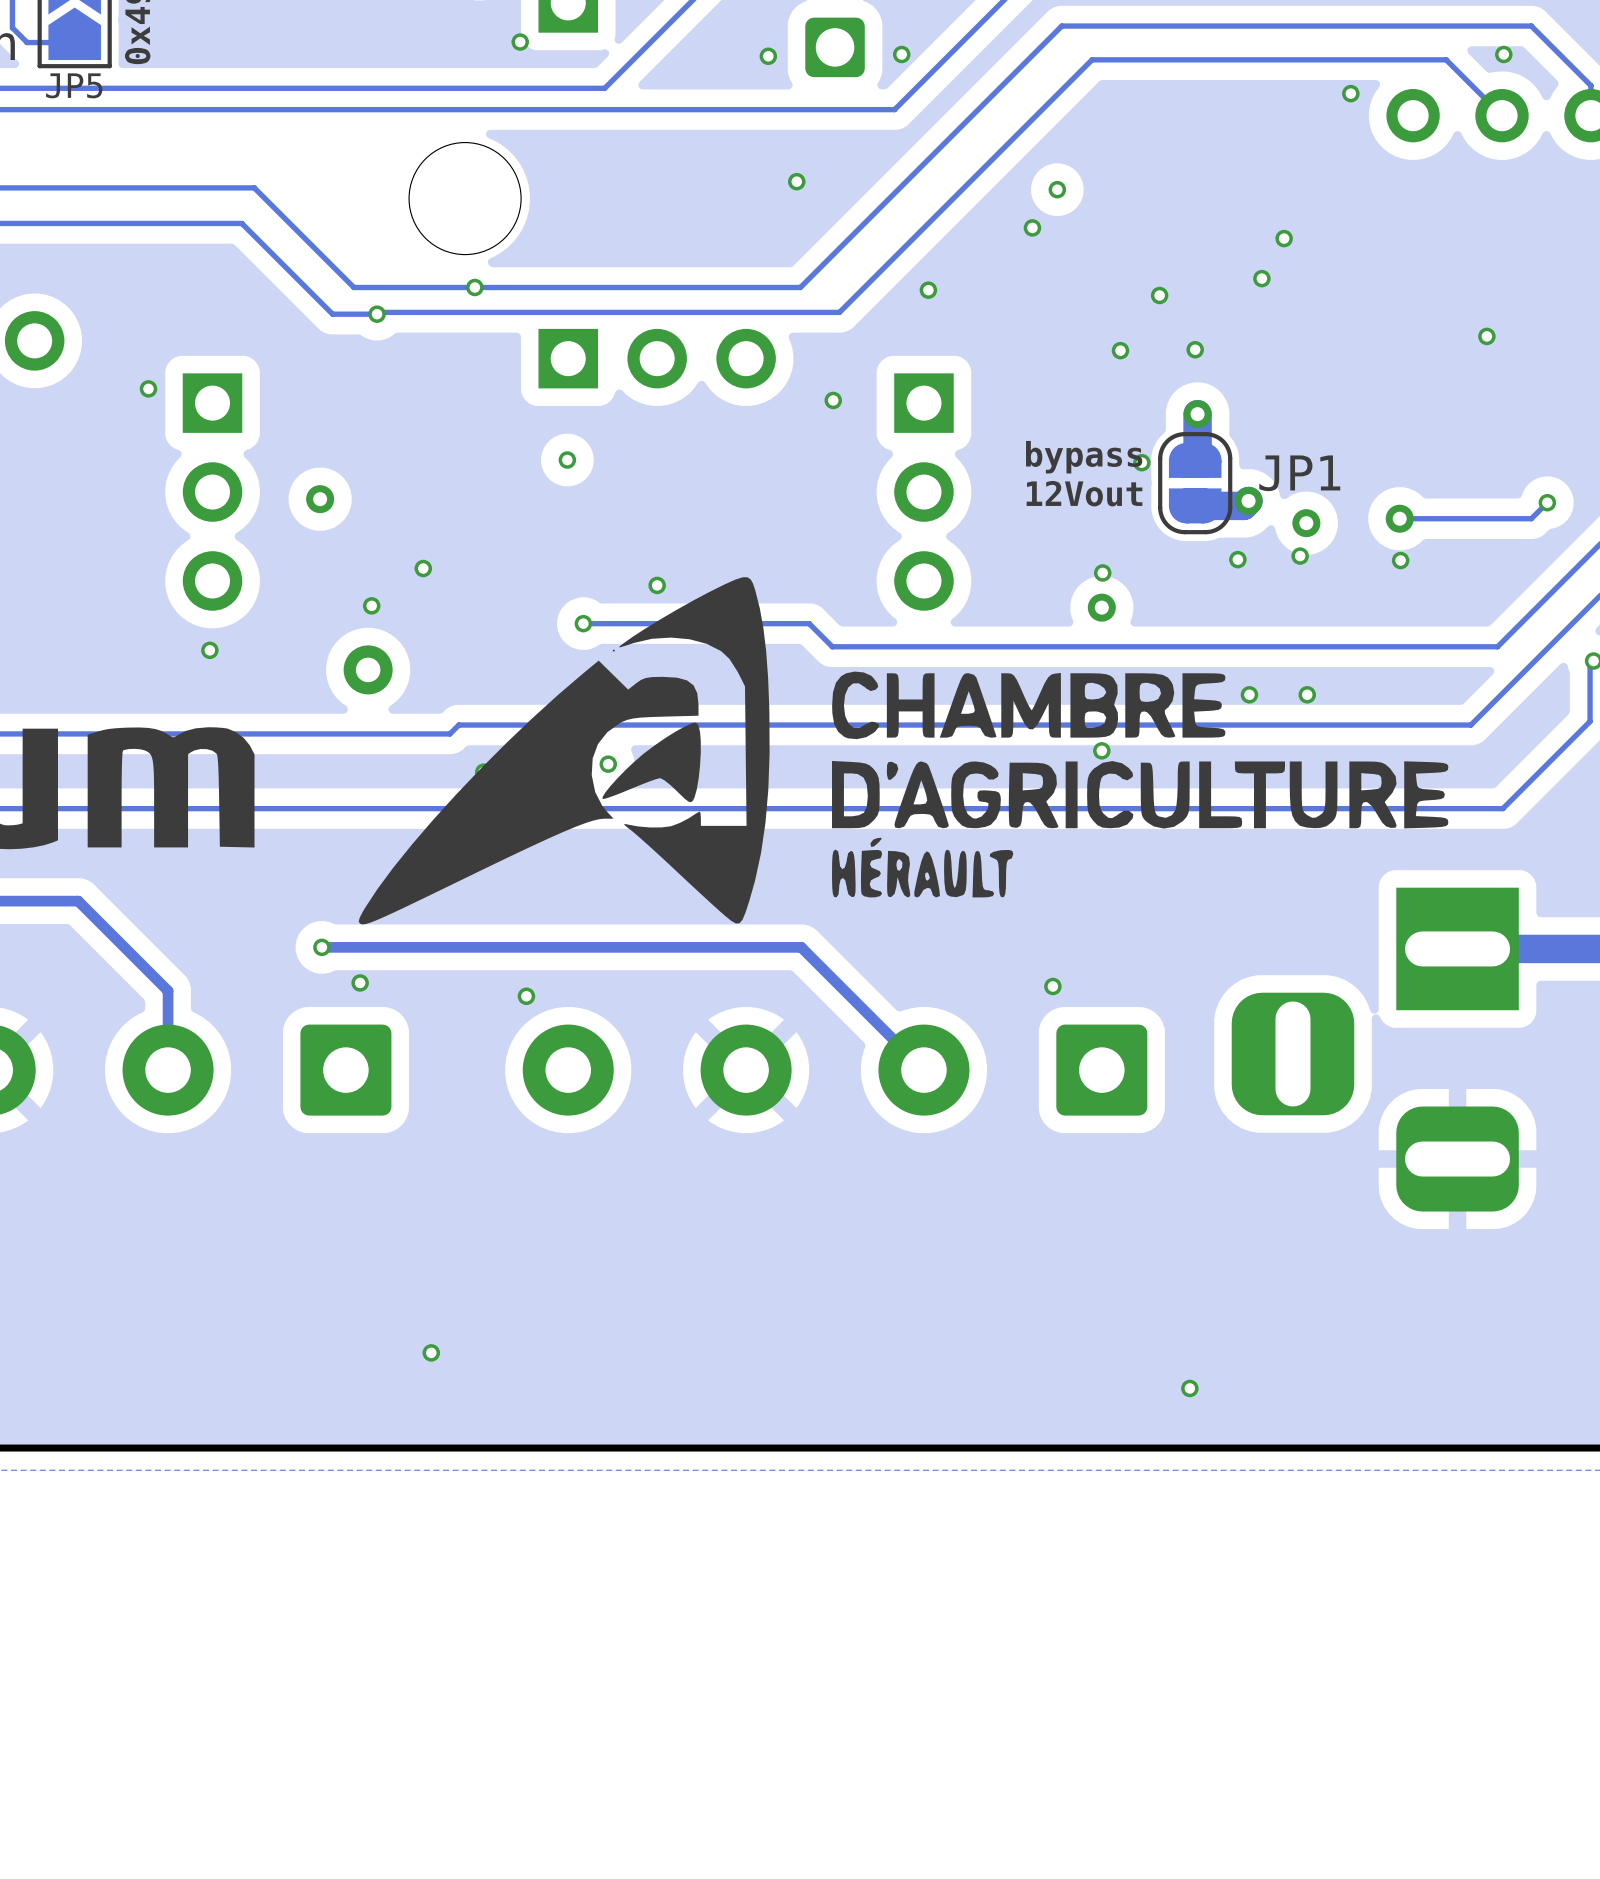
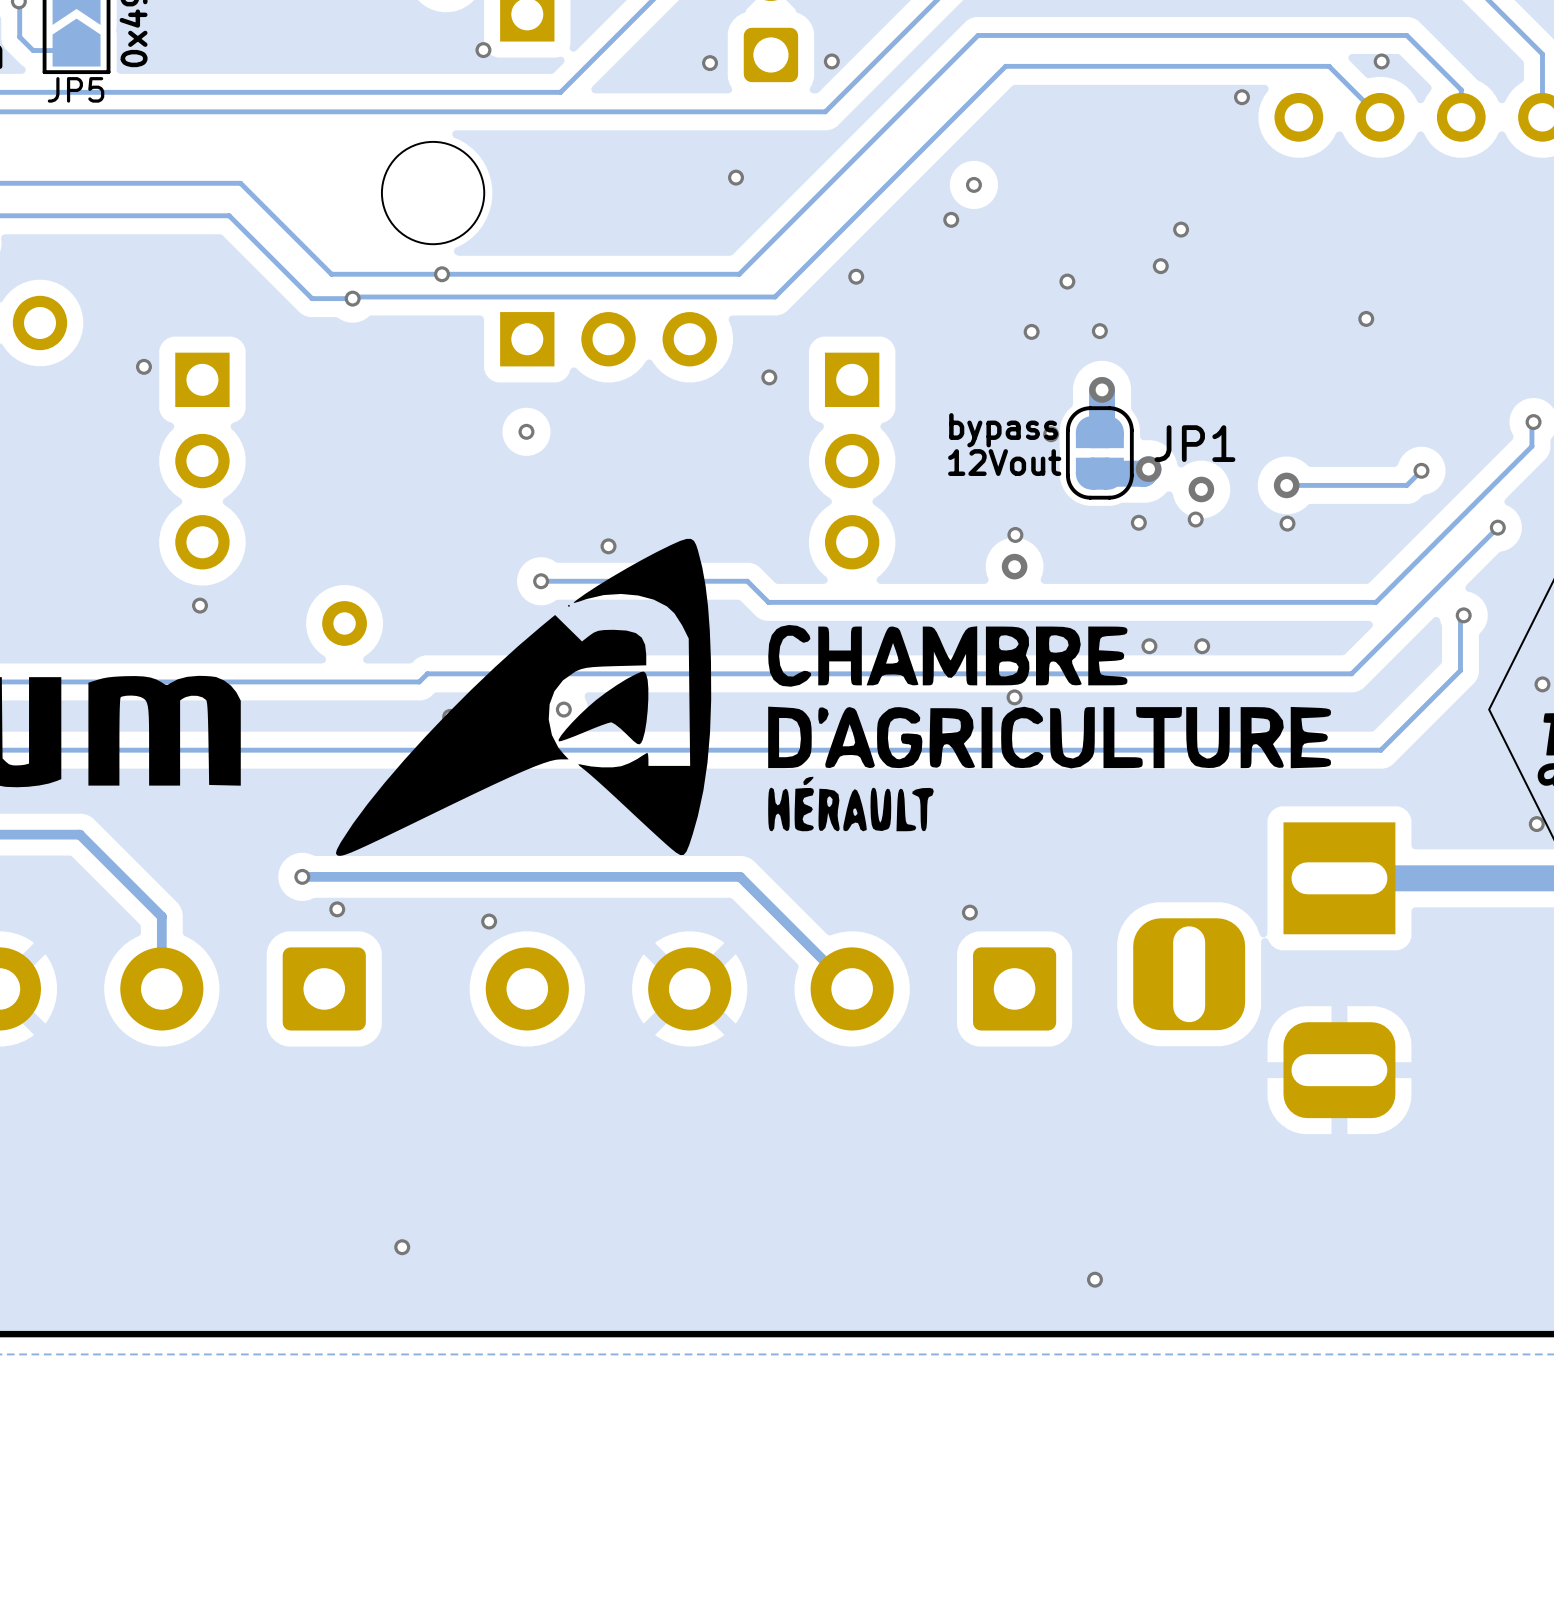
via: (320, 499) -> none
via: (423, 568) -> none
via: (371, 605) -> none

